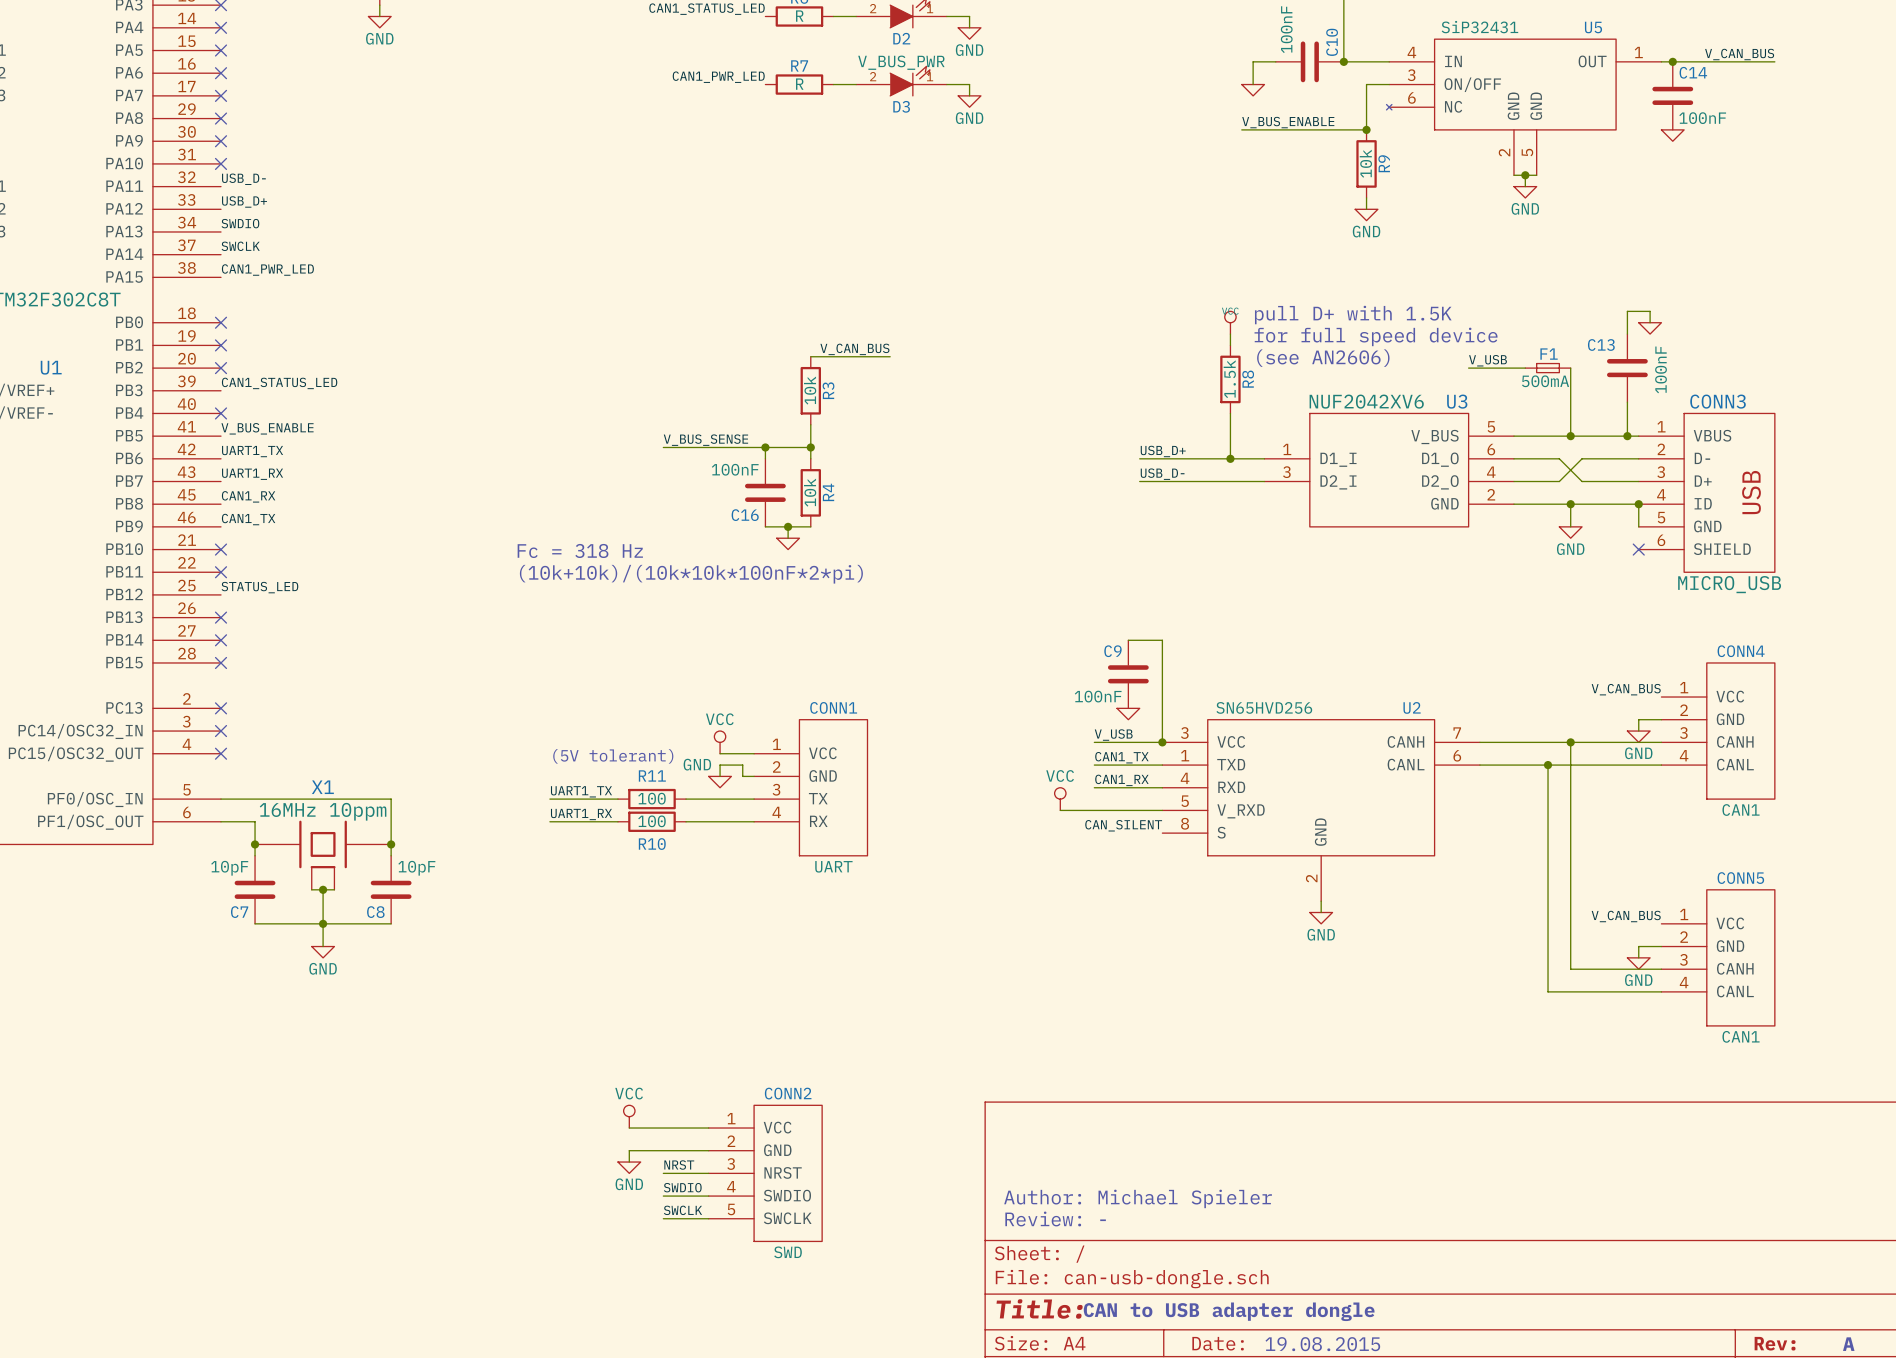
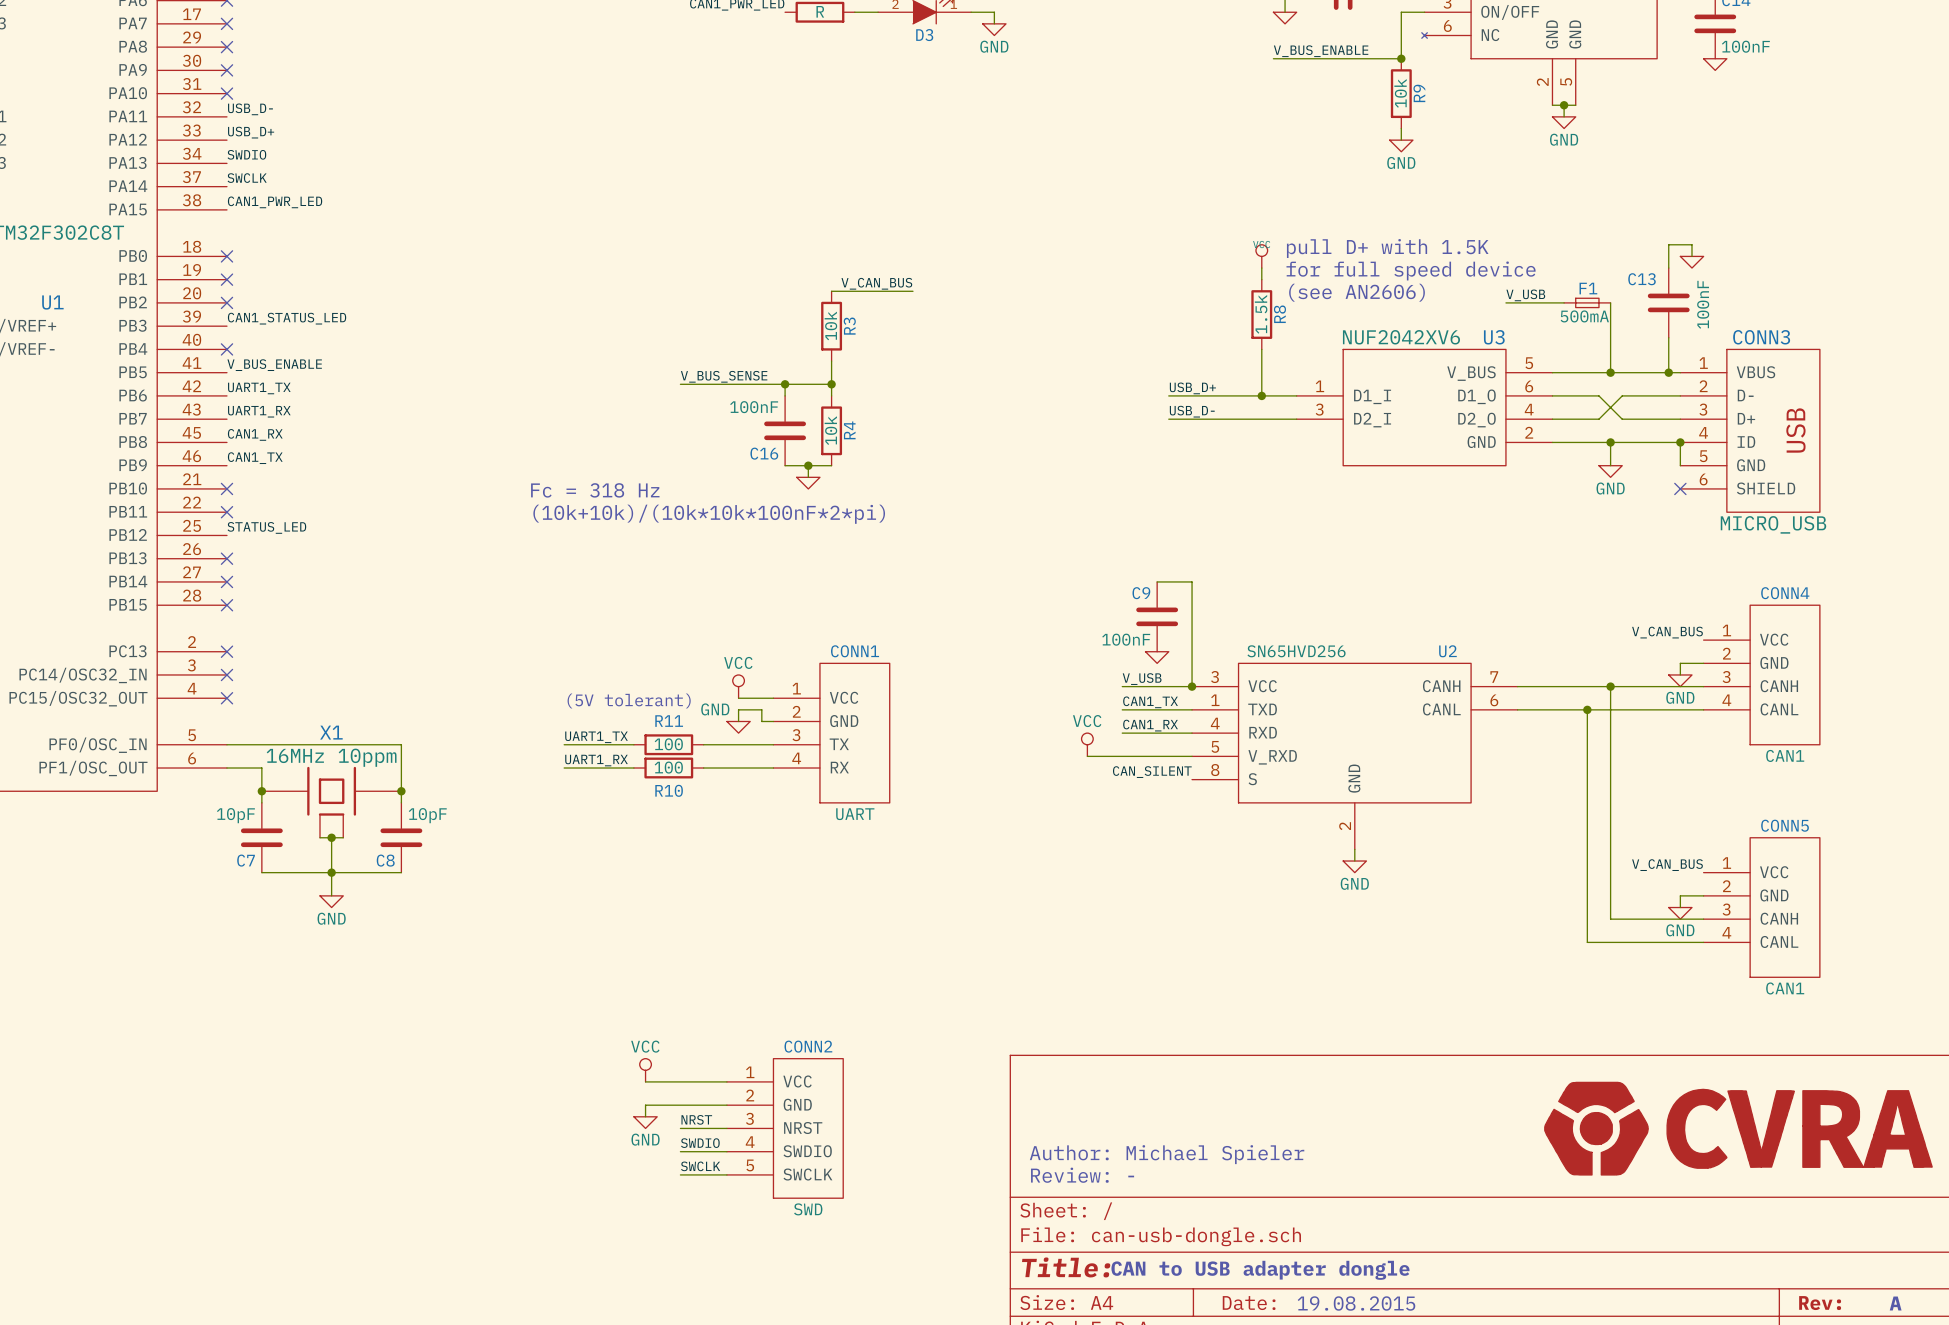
drawing: none -> [1544, 1082, 1933, 1176]

